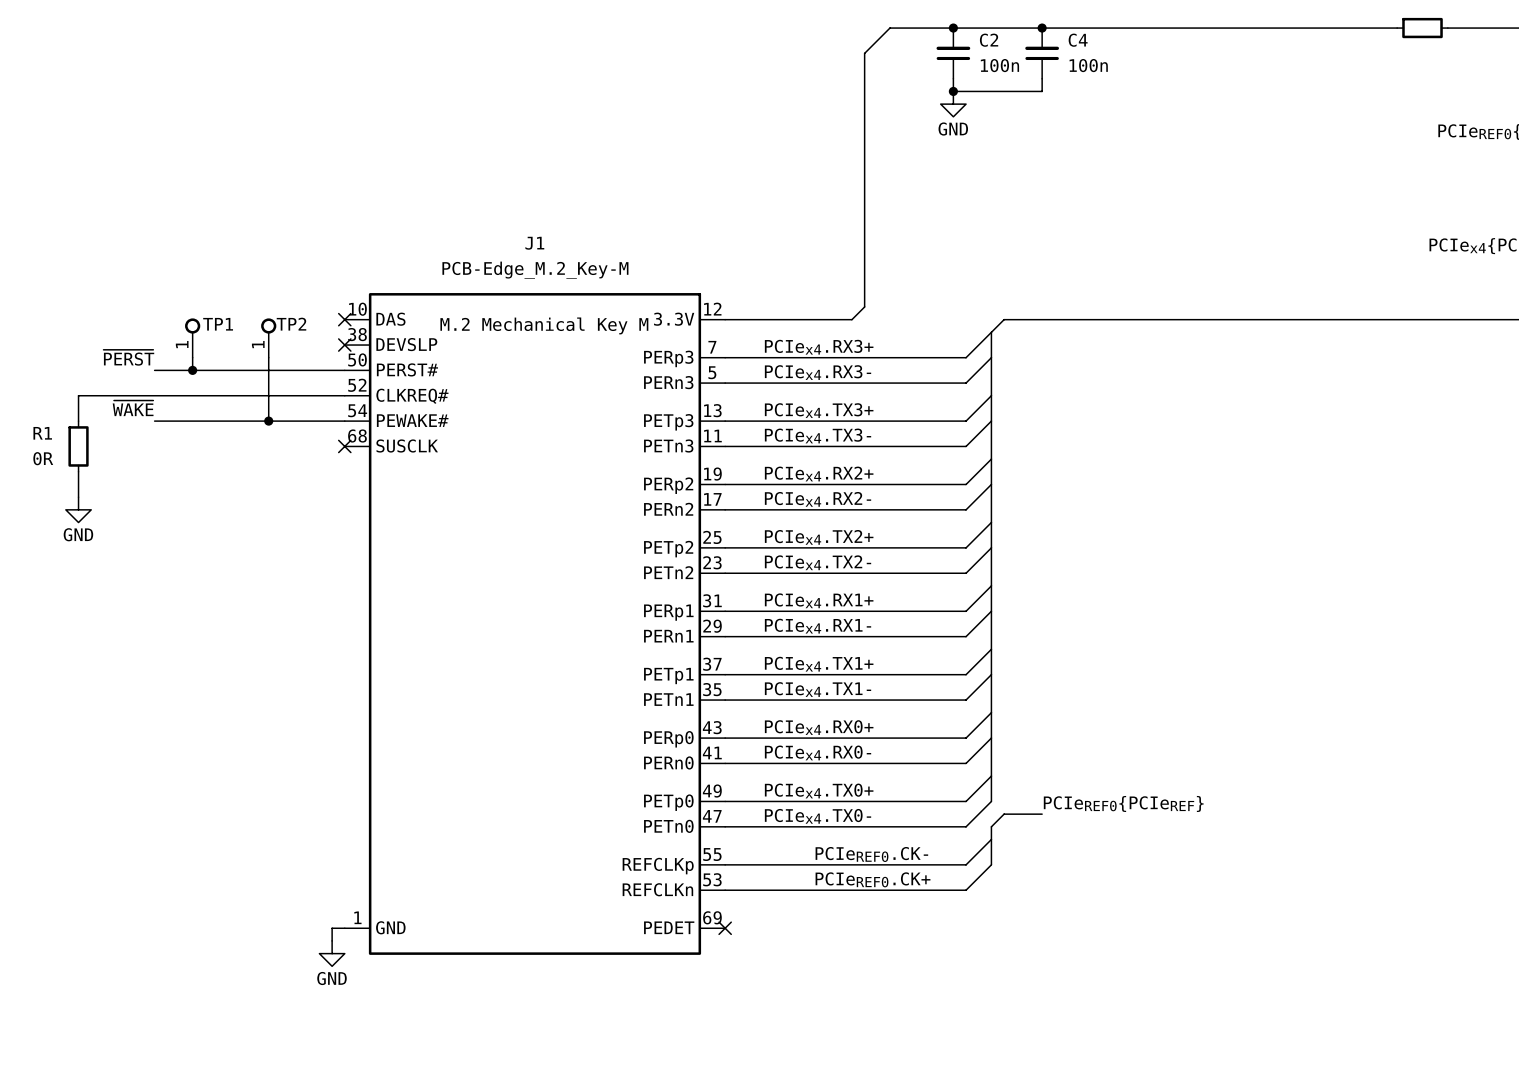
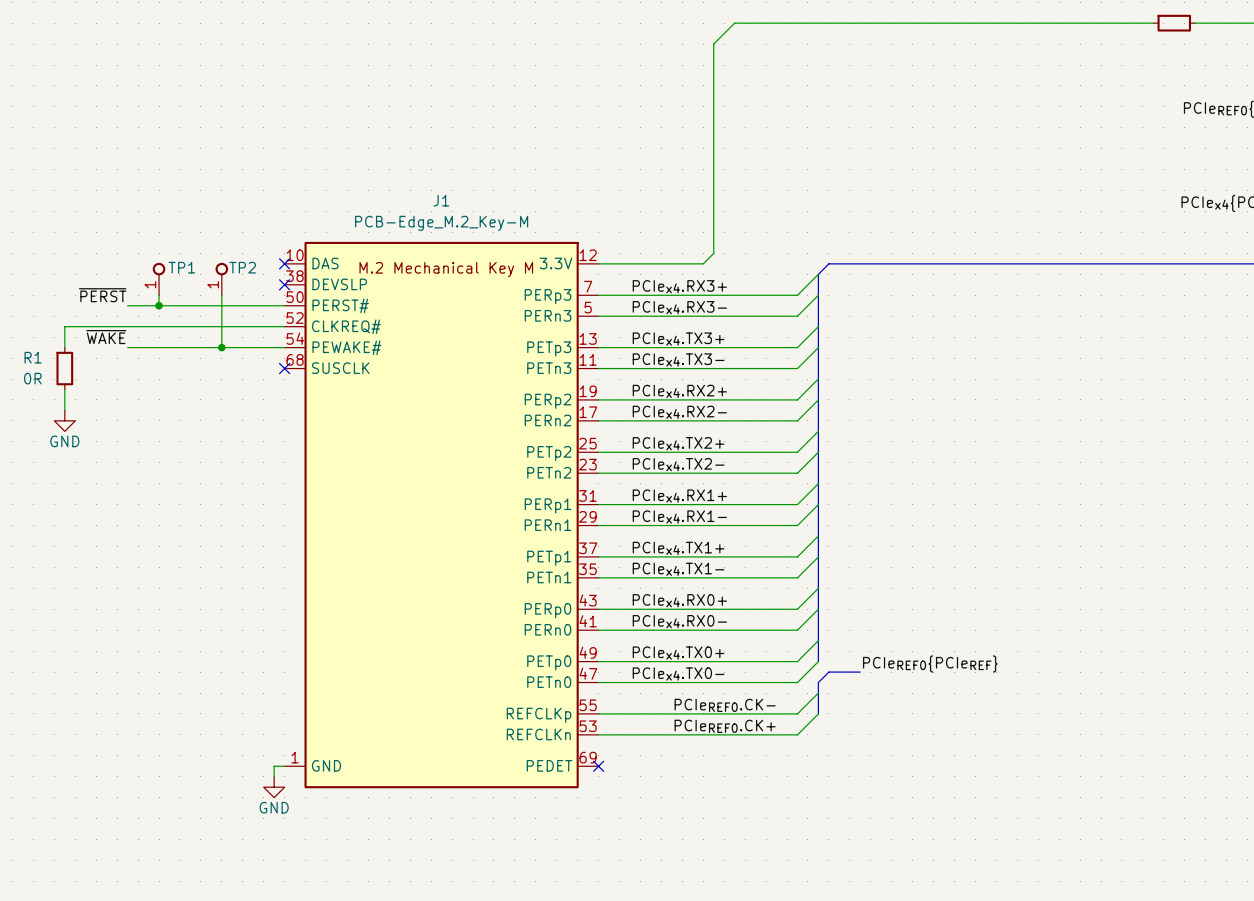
junction: (953, 28) -> none
junction: (1042, 28) -> none
C2: (953, 53) -> none
C4: (1042, 53) -> none
wire: (953, 78) (953, 91) (1042, 91) (1042, 78) -> none
junction: (953, 91) -> none
power symbol: GND (953, 104) -> none

